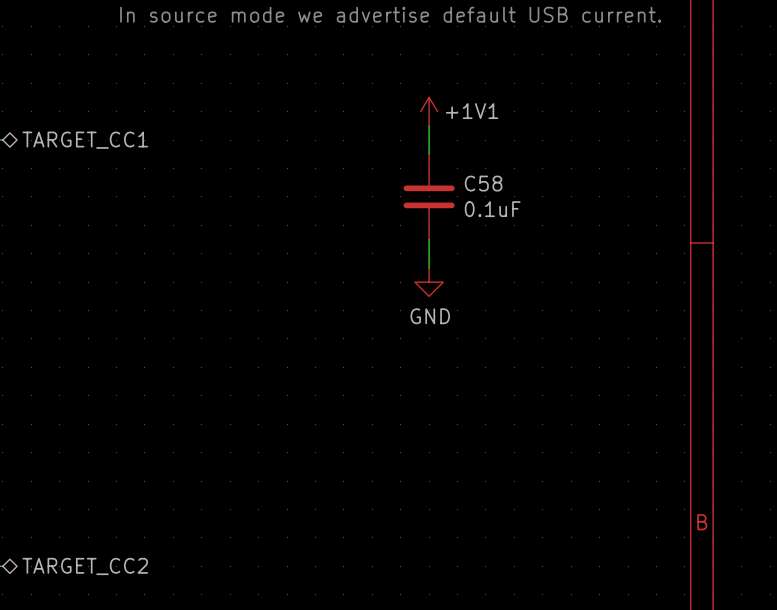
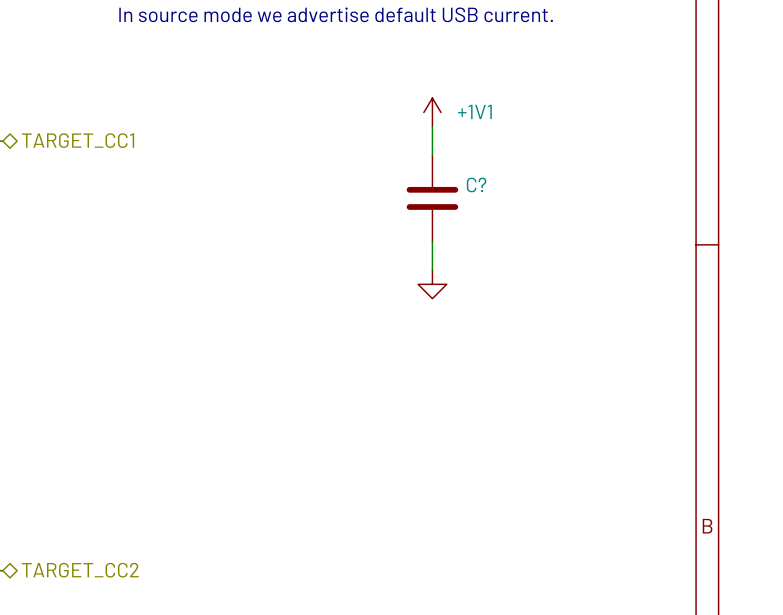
C58 name: C58 (483, 183) -> C? (476, 184)
C58 value: 0.1uF (492, 209) -> none
power symbol text: GND (430, 316) -> none

